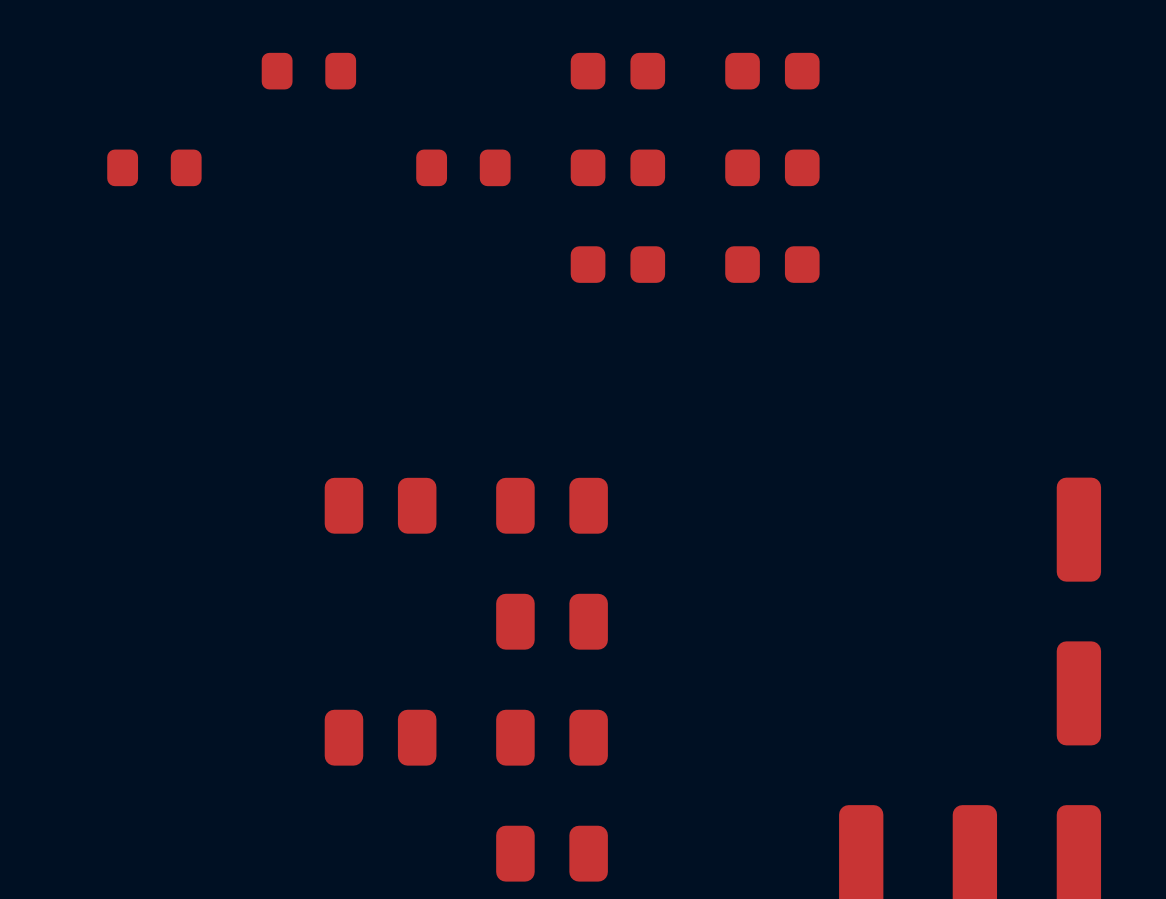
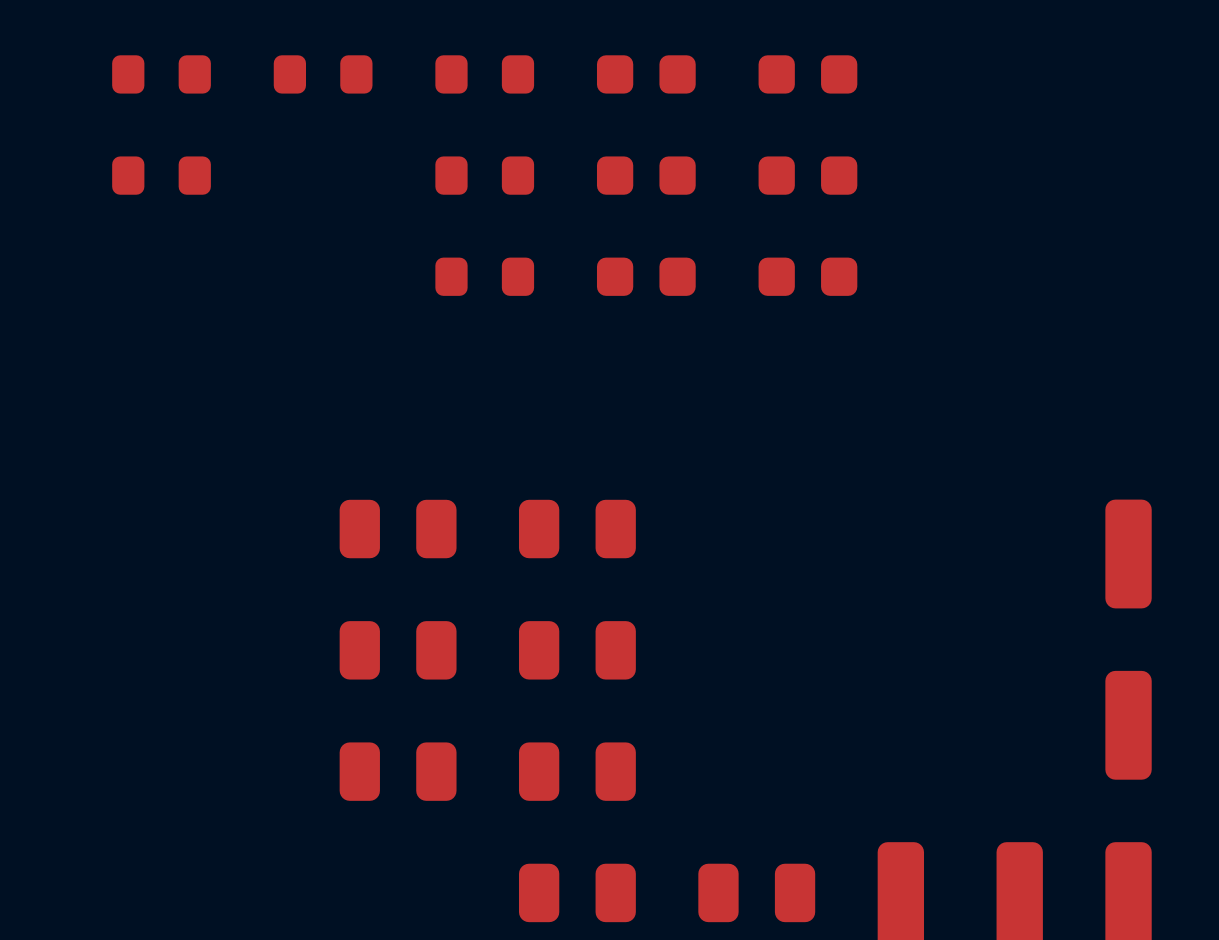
part: none -> (161, 74)
part: none -> (484, 74)
part: none -> (484, 276)
part: none -> (398, 650)
part: none -> (756, 892)

